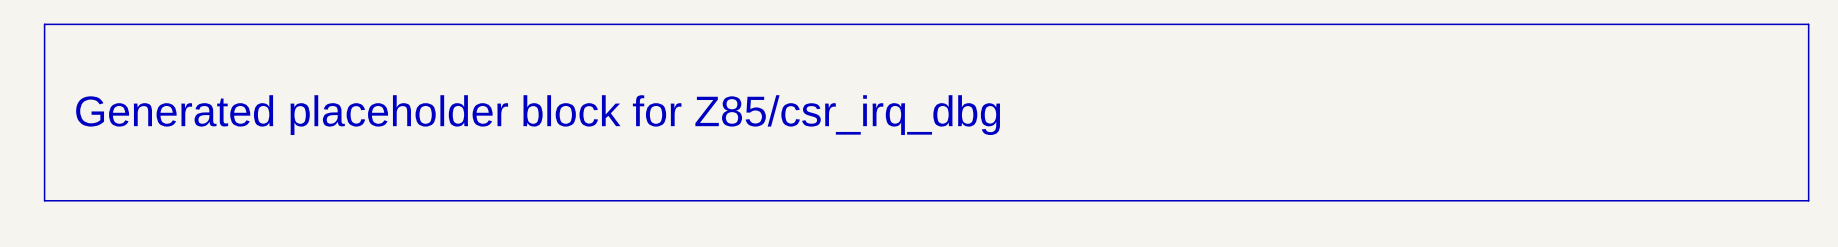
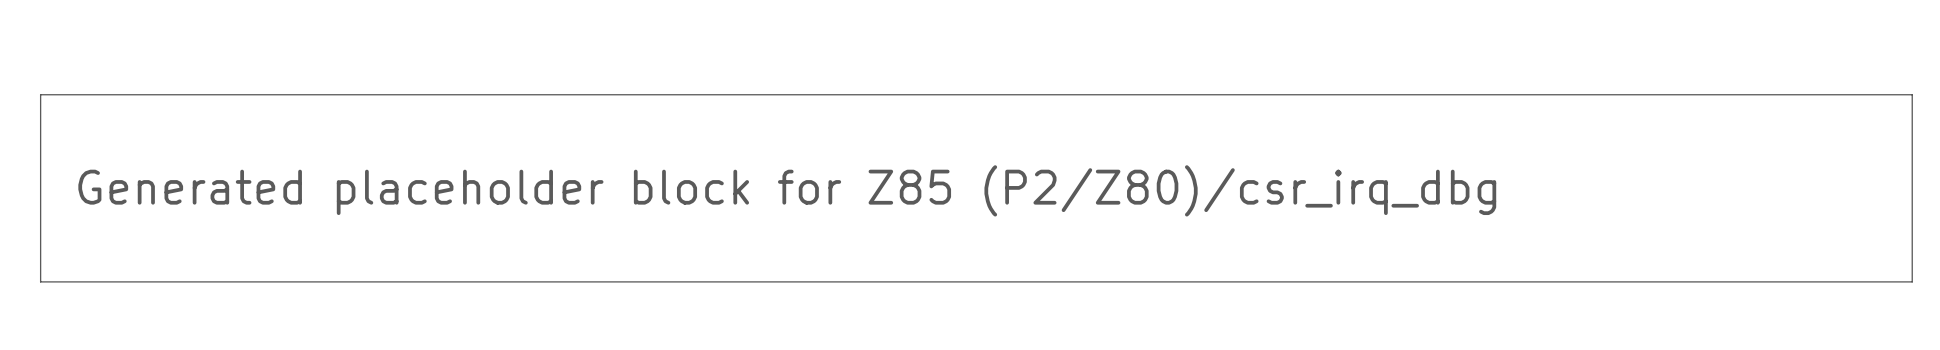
text: Generated placeholder block for Z85/csr_irq_dbg (538, 115) -> Generated placeholder block for Z85 (P2/Z80)/csr_irq_dbg (787, 190)

